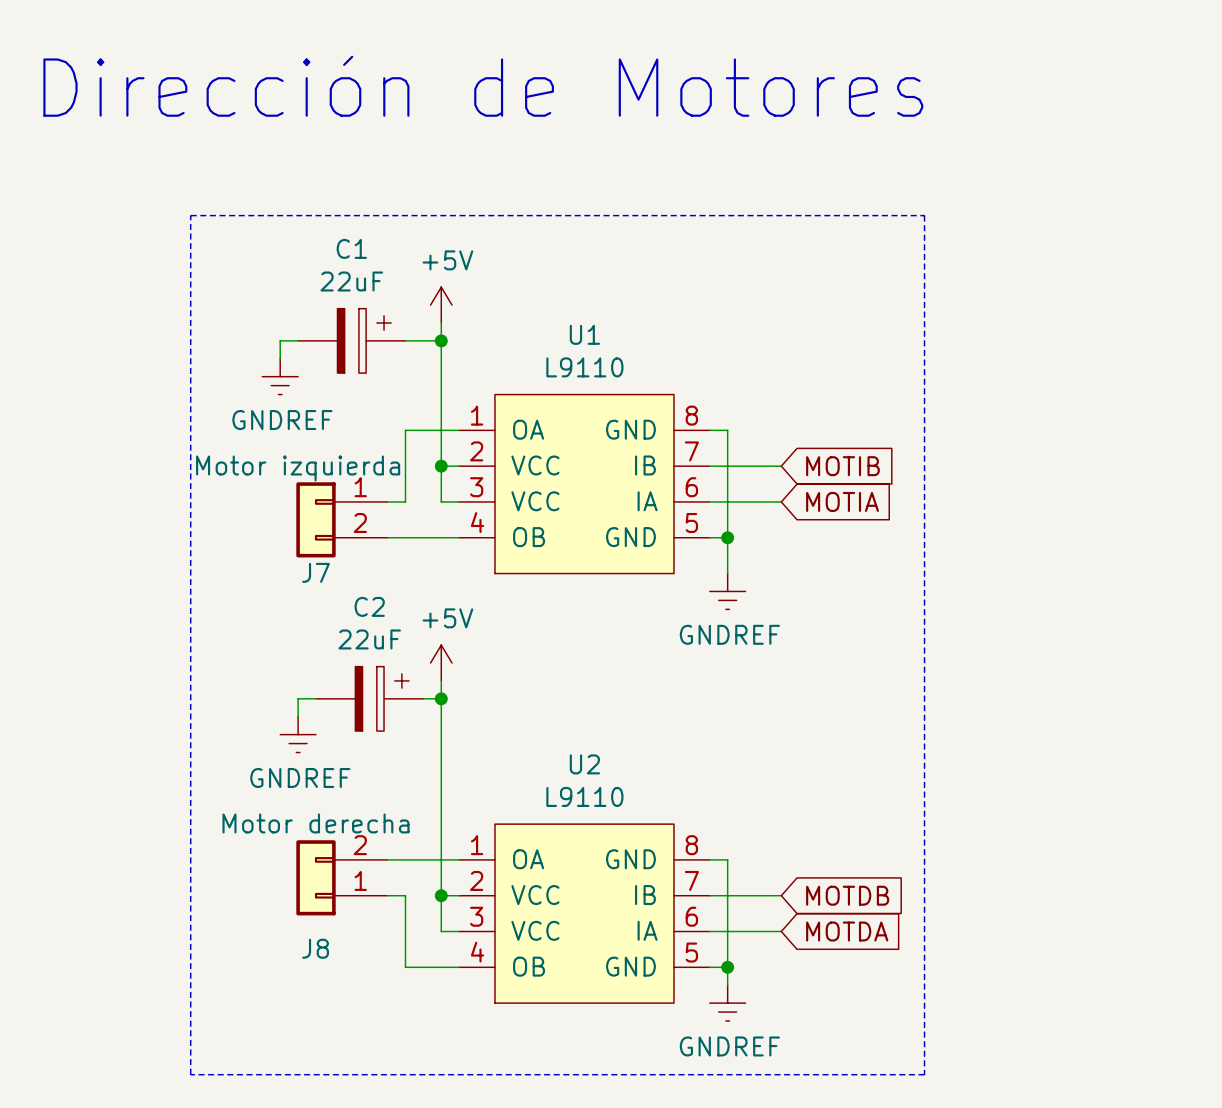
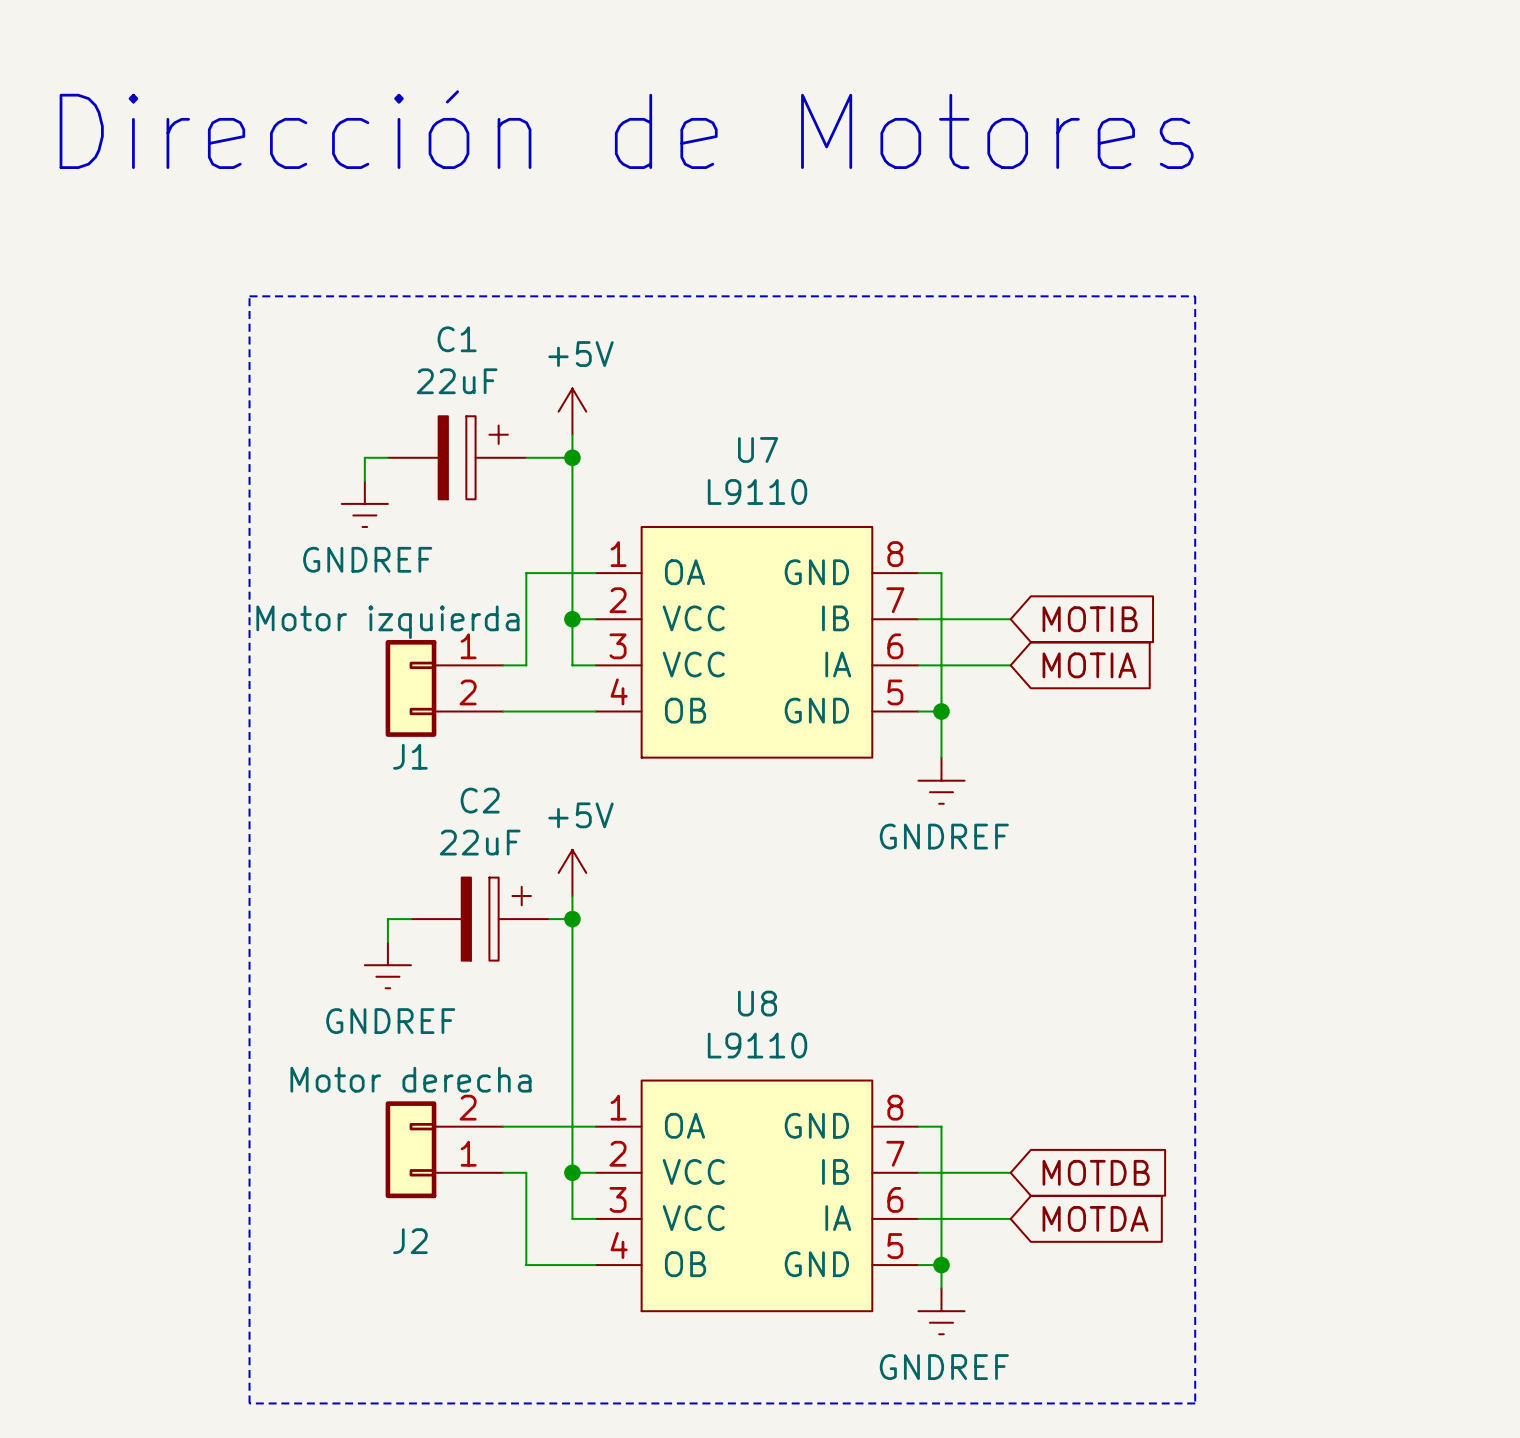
U1 name: U1 (584, 334) -> U7 (758, 450)
J7 name: J7 (316, 572) -> J1 (410, 756)
U2 name: U2 (584, 764) -> U8 (757, 1003)
J8 name: J8 (315, 948) -> J2 (410, 1241)

